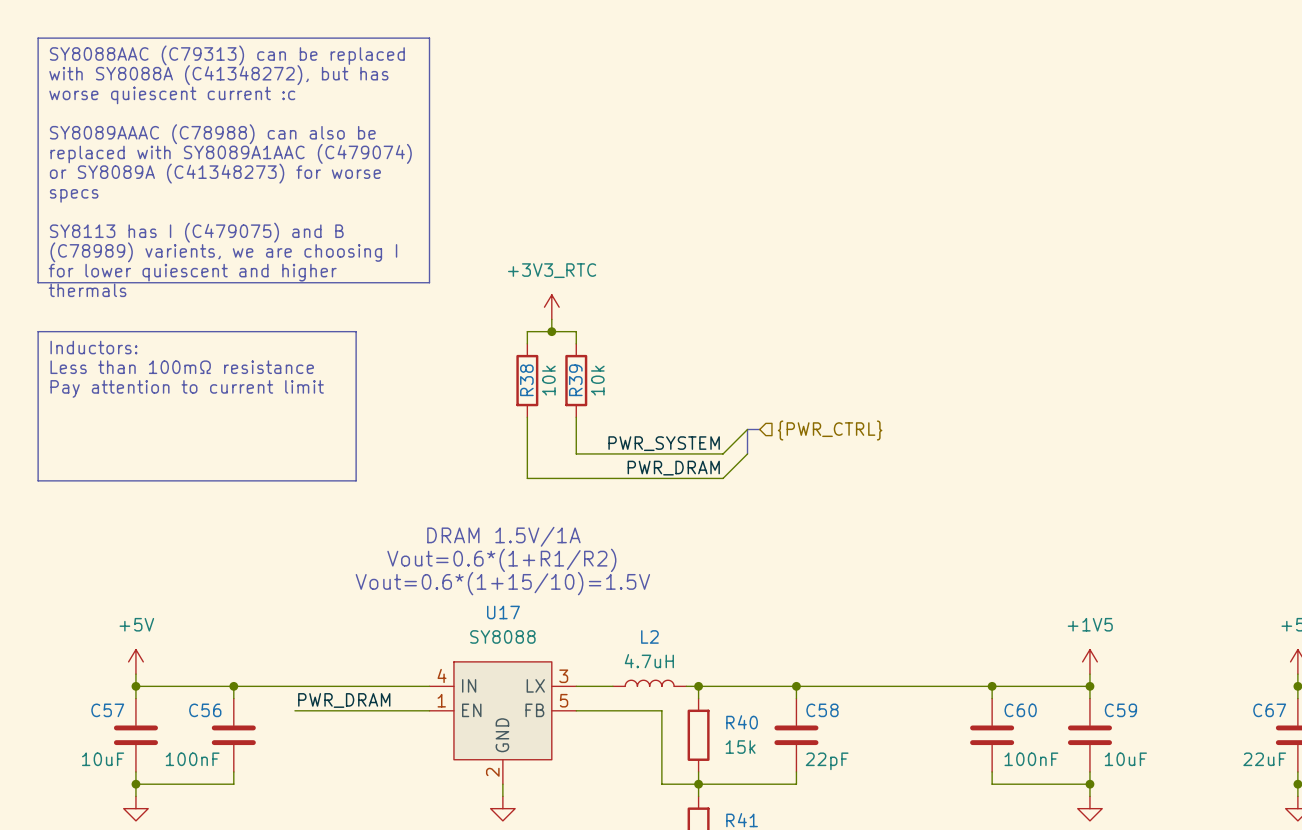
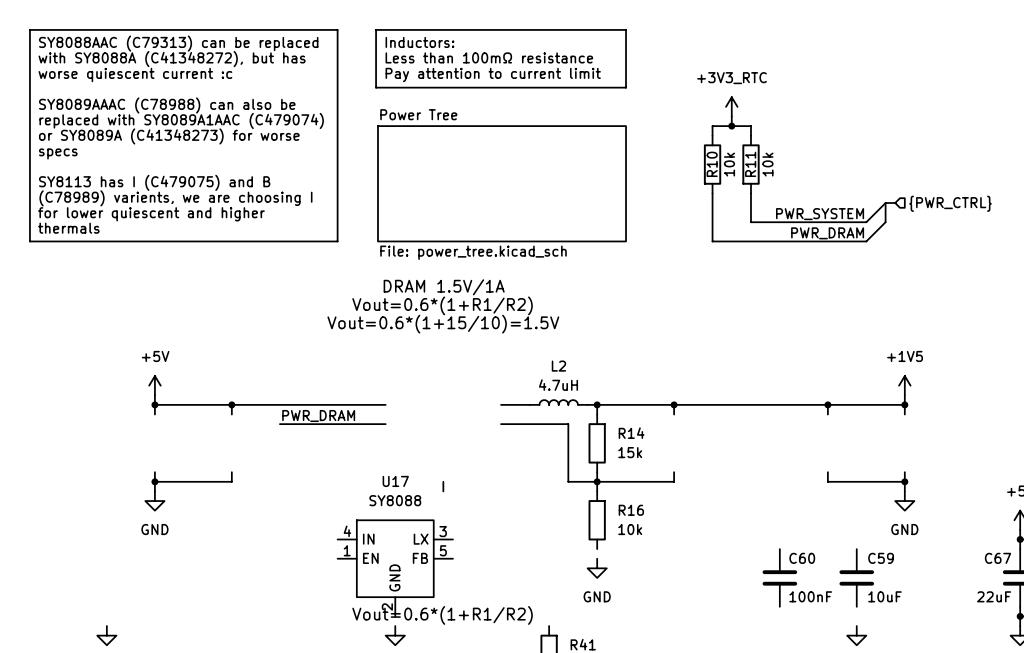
line: none -> (376, 29) (626, 29) (626, 87) (376, 87) (376, 29)
text: none -> Inductors: (419, 42)
text: none -> Less than 100mΩ resistance (489, 57)
text: none -> Pay attention to current limit (493, 74)
power symbol: none -> +3V3_RTC (731, 106)
wire: none -> (731, 116) (731, 126)
junction: none -> (731, 126)
wire: none -> (712, 135) (712, 126) (751, 126) (751, 135)
R10: none -> 10k (712, 164)
R11: none -> 10k (751, 164)
sheet Power Tree: none -> File: power_tree.kicad_sch (502, 183)
wire: none -> (712, 193) (712, 241) (866, 241) (885, 222)
wire: none -> (751, 193) (751, 222) (866, 222) (885, 203)
bus: none -> (895, 203) (885, 203) (885, 222)
hierarchical label: none -> {PWR_CTRL} (950, 203)
label: none -> PWR_SYSTEM (820, 214)
line: (38, 282) (429, 282) -> (29, 222) (29, 241) (337, 241) (337, 222)
label: none -> PWR_DRAM (827, 233)
power symbol: +3V3_RTC (551, 307) -> none
wire: (551, 319) (551, 331) -> none
line: (38, 331) (38, 480) (356, 480) (356, 331) (38, 331) -> none
junction: (551, 331) -> none
wire: (527, 343) (527, 331) (576, 331) (576, 343) -> none
text: Inductors: (93, 347) -> none
text: Less than 100mΩ resistance (182, 367) -> none
R38: 10k (527, 380) -> none
R39: 10k (576, 380) -> none
text: Pay attention to current limit (187, 388) -> none
text: none -> Vout=0.6*(1+R1/R2) (442, 305)
wire: (527, 417) (527, 478) (723, 478) (747, 453) -> none
wire: (576, 417) (576, 453) (723, 453) (747, 429) -> none
bus: (759, 429) (747, 429) (747, 453) -> none
hierarchical label: {PWR_CTRL} (830, 430) -> none
label: PWR_SYSTEM (664, 443) -> none
label: PWR_DRAM (673, 468) -> none
power symbol: none -> +5V (154, 385)
junction: none -> (154, 404)
junction: none -> (231, 404)
junction: none -> (597, 404)
junction: none -> (674, 404)
junction: none -> (827, 404)
junction: none -> (904, 404)
text position: DRAM 1.5V/1A (503, 536) -> DRAM 1.5V/1A (444, 287)
text: Vout=0.6*(1+R1/R2) (501, 560) -> none
R14: none -> 15k (597, 443)
text position: Vout=0.6*(1+15/10)=1.5V (502, 583) -> Vout=0.6*(1+15/10)=1.5V (443, 324)
junction: none -> (154, 481)
junction: none -> (597, 481)
junction: none -> (904, 481)
power symbol: none -> GND (154, 501)
power symbol: none -> GND (904, 501)
power symbol: +5V (135, 661) -> none
R16: none -> 10k (597, 520)
power symbol position: +1V5 (1089, 661) -> +1V5 (904, 385)
wire: (135, 674) (135, 698) -> (154, 395) (154, 414)
wire: (1089, 674) (1089, 698) -> (904, 395) (904, 414)
L2 position: (649, 683) -> (558, 402)
wire: (135, 686) (429, 686) -> (154, 404) (385, 404)
junction: (135, 686) -> none
wire: (233, 686) (233, 698) -> (231, 404) (231, 414)
junction: (233, 686) -> none
wire: (576, 686) (612, 686) -> (501, 404) (529, 404)
wire: (686, 686) (1089, 686) -> (587, 404) (904, 404)
wire: (698, 686) (698, 698) -> (597, 404) (597, 414)
junction: (698, 686) -> none
wire: (796, 686) (796, 698) -> (674, 404) (674, 414)
junction: (796, 686) -> none
wire: (992, 686) (992, 698) -> (827, 404) (827, 414)
junction: (992, 686) -> none
junction: (1089, 686) -> none
label position: PWR_DRAM (344, 700) -> PWR_DRAM (318, 416)
wire: (294, 710) (429, 710) -> (279, 424) (385, 424)
wire: (576, 710) (661, 710) (661, 784) (796, 784) (796, 771) -> (501, 424) (568, 424) (568, 481) (674, 481) (674, 472)
power symbol: none -> GND (597, 568)
C57: 10uF (135, 735) -> none
C56: 100nF (233, 735) -> none
R40: 15k (698, 735) -> none
C58: 22pF (796, 735) -> none
wire: (135, 771) (135, 796) -> (154, 472) (154, 491)
wire: (233, 771) (233, 784) (135, 784) -> (231, 472) (231, 481) (154, 481)
wire: (698, 771) (698, 796) -> (597, 472) (597, 491)
wire: (992, 771) (992, 784) (1089, 784) -> (827, 472) (827, 481) (904, 481)
wire: (1089, 771) (1089, 796) -> (904, 472) (904, 491)
text: none -> Vout=0.6*(1+R1/R2) (442, 615)
junction: (135, 784) -> none
wire: (502, 784) (502, 796) -> (443, 481) (443, 491)
junction: (698, 784) -> none
junction: (1089, 784) -> none

